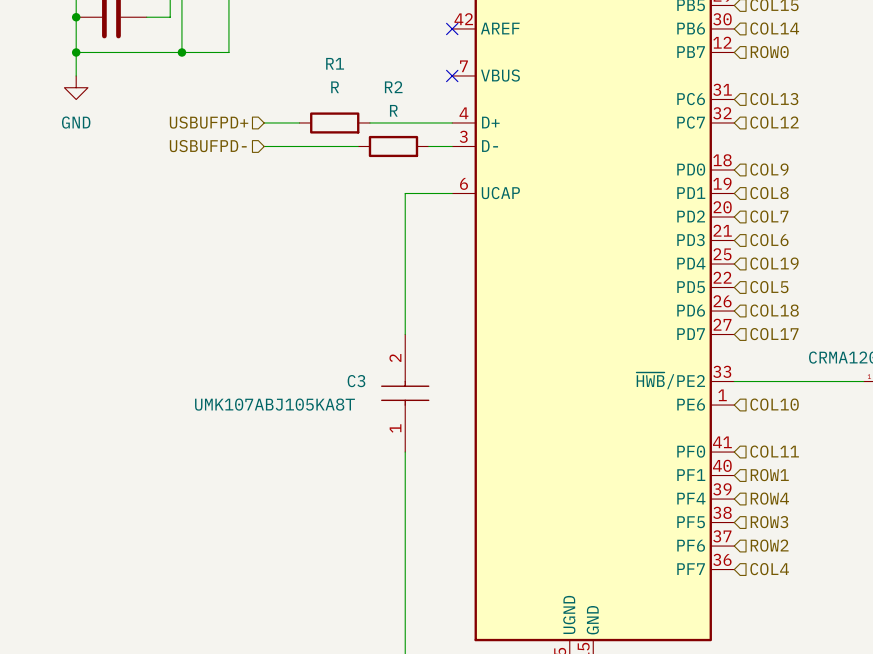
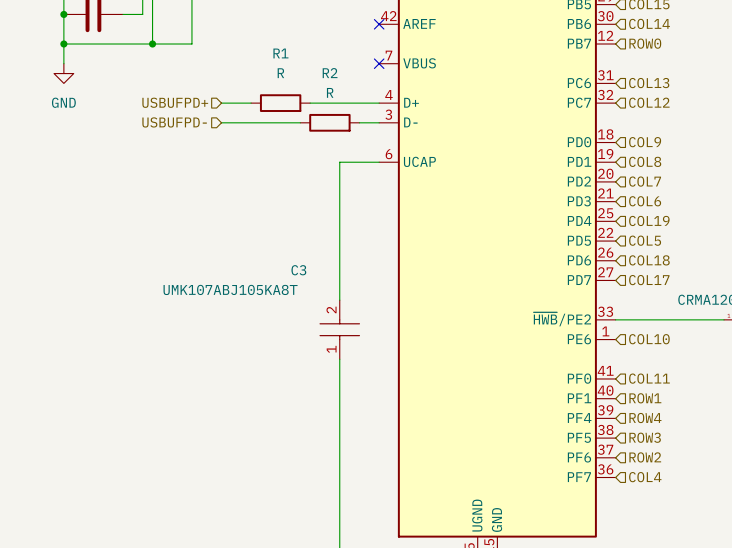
C3 symbol: [381, 334, 430, 453] -> [319, 300, 361, 360]
C3 name position: C3 (356, 381) -> C3 (298, 270)
C3 value position: UMK107ABJ105KA8T (274, 404) -> UMK107ABJ105KA8T (230, 289)

